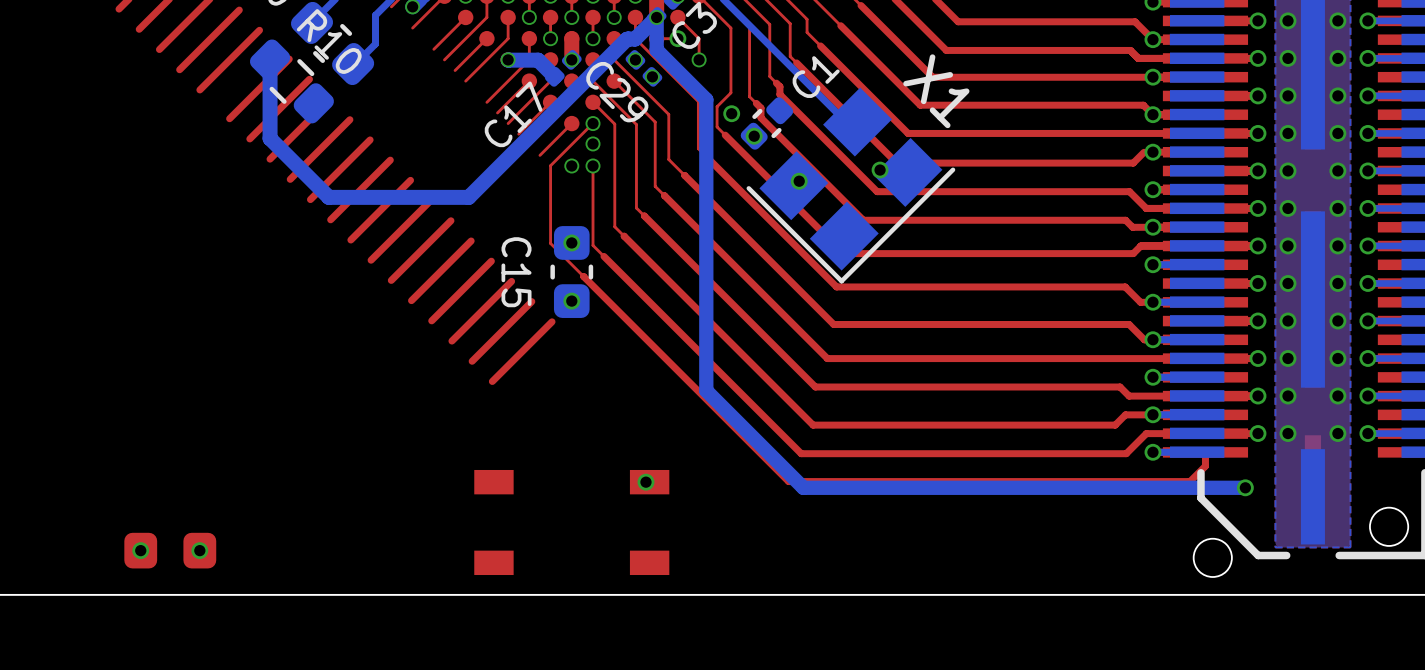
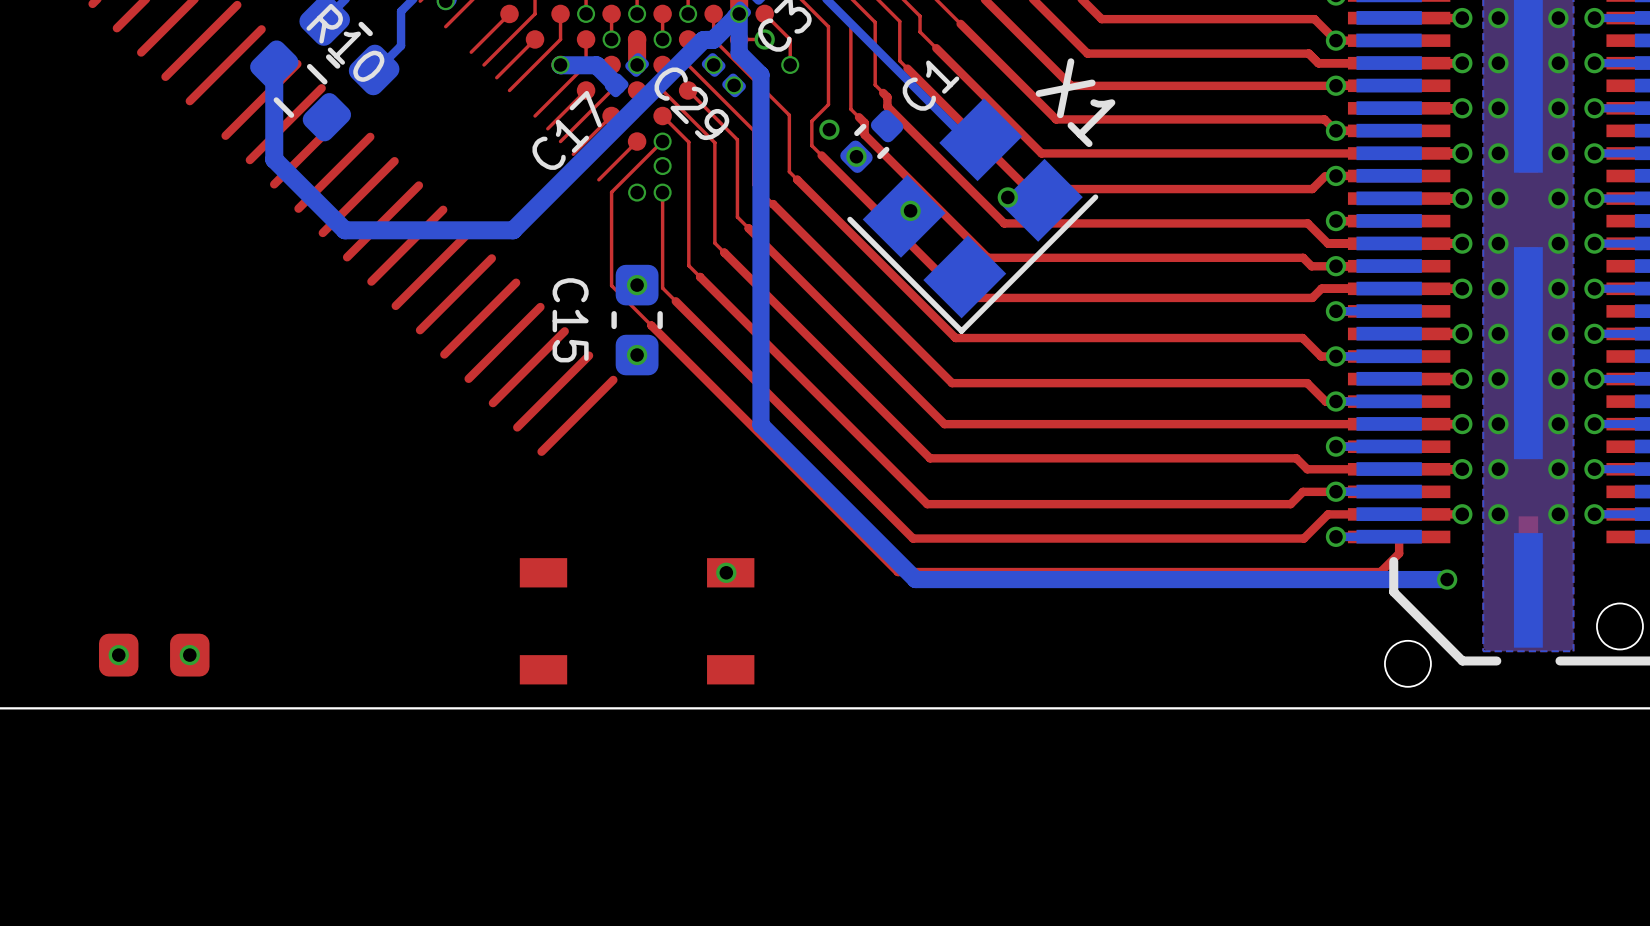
bottom track: (674, 68) (706, 99) (706, 390) -> (760, 74) (760, 424) (798, 462)

